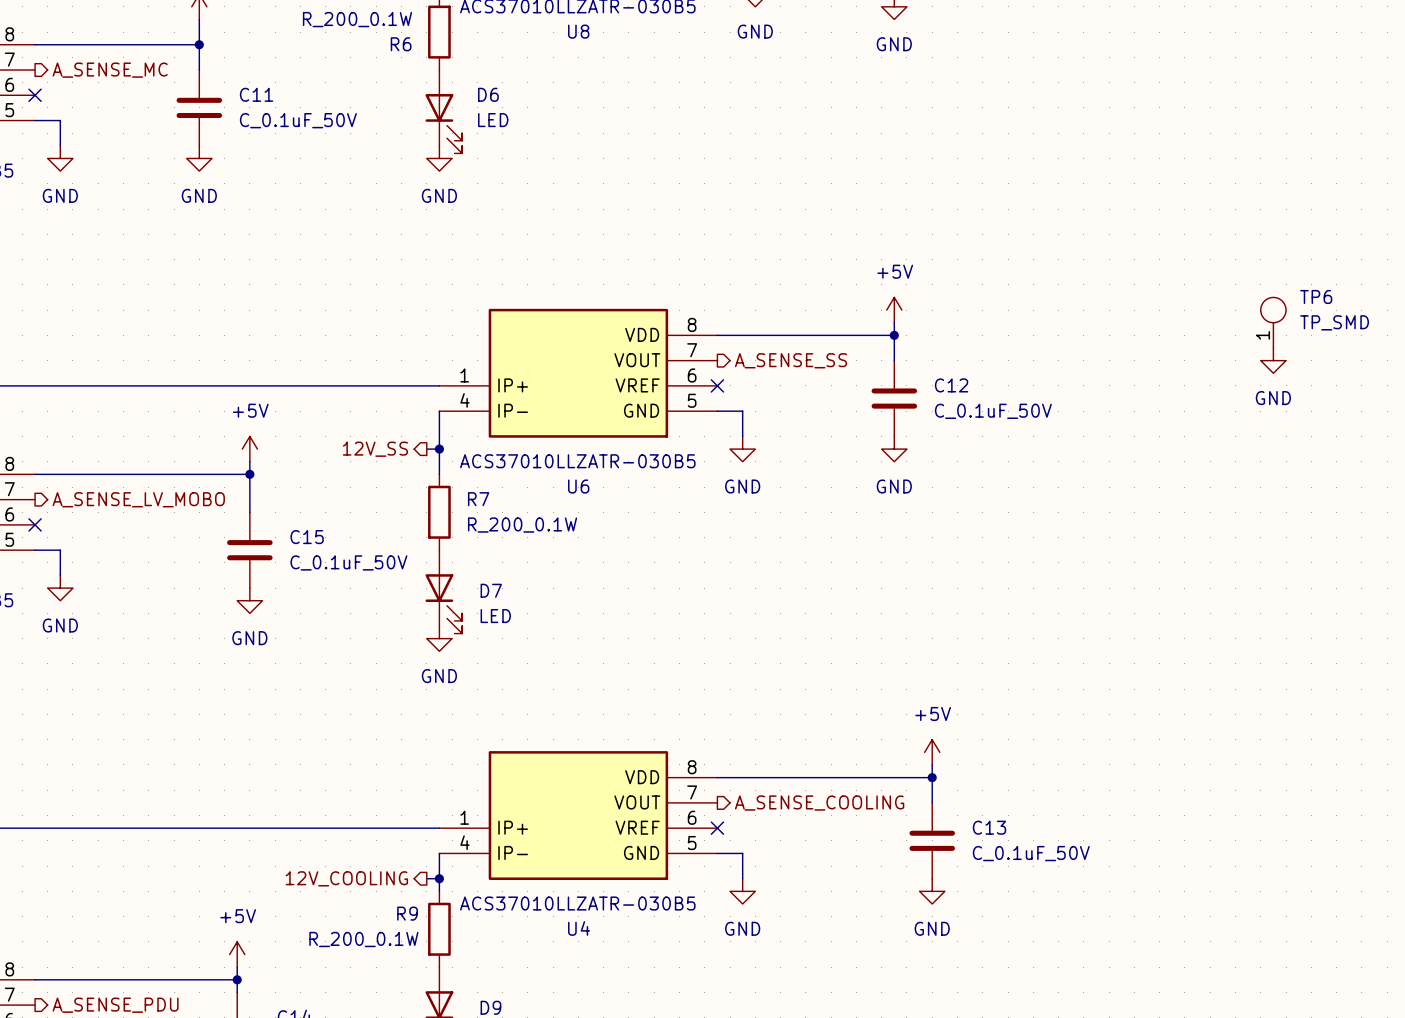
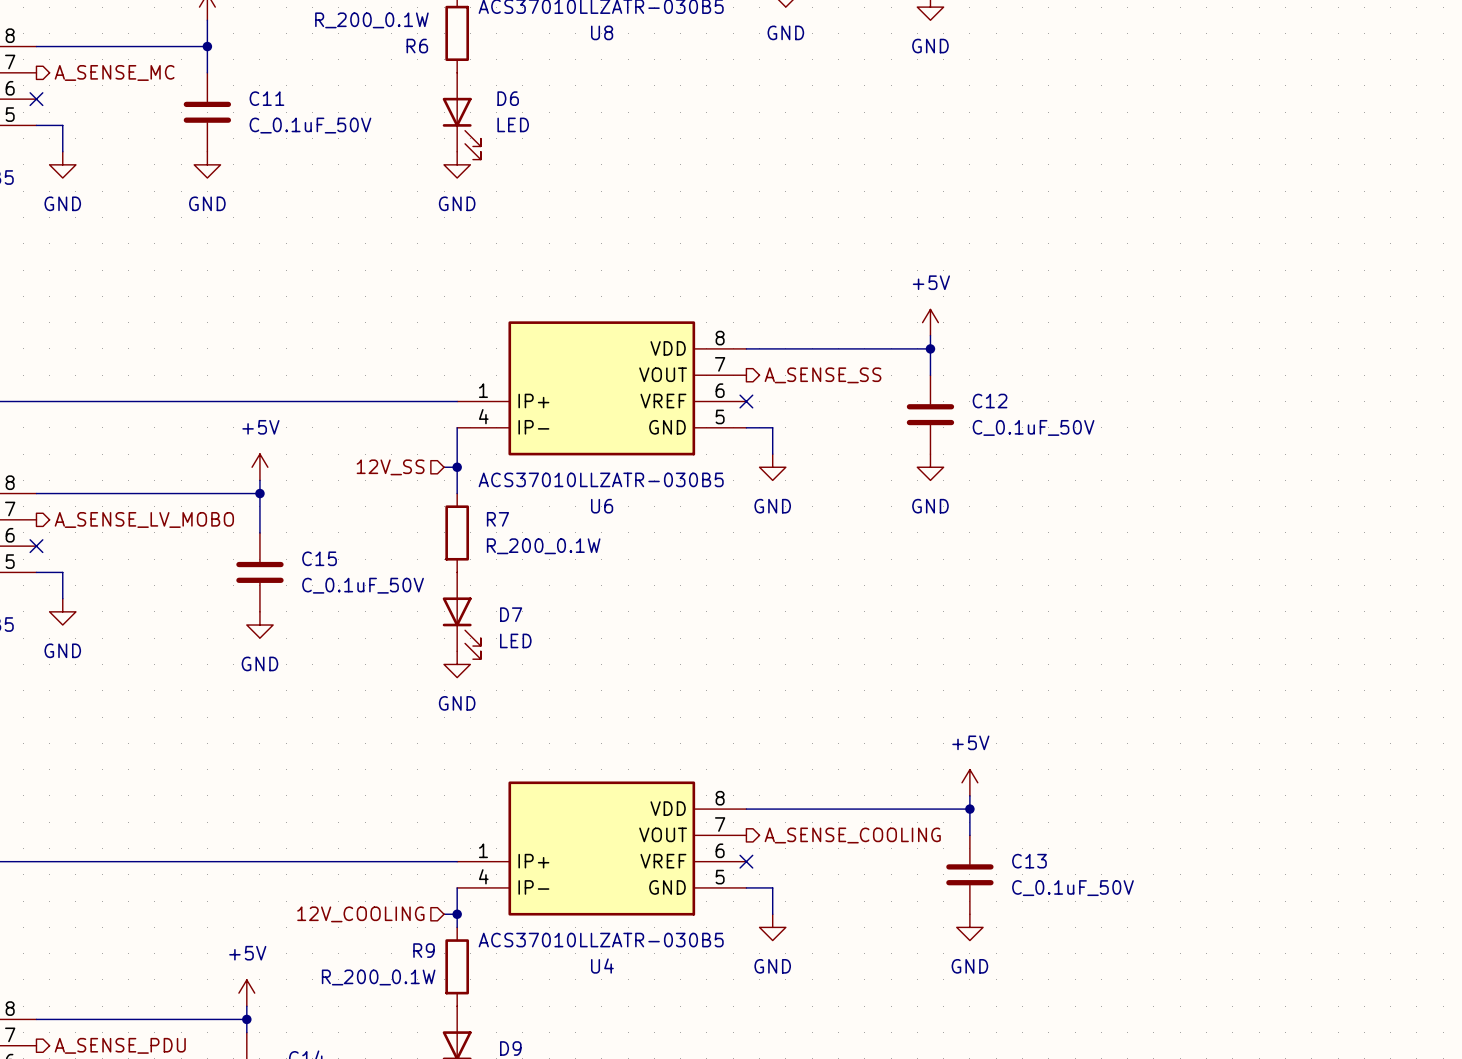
TP6: TP_SMD (1273, 322) -> none
power symbol: GND (1273, 360) -> none
hierarchical label shape: output (375, 449) -> input (390, 467)
hierarchical label shape: output (346, 878) -> input (360, 914)

